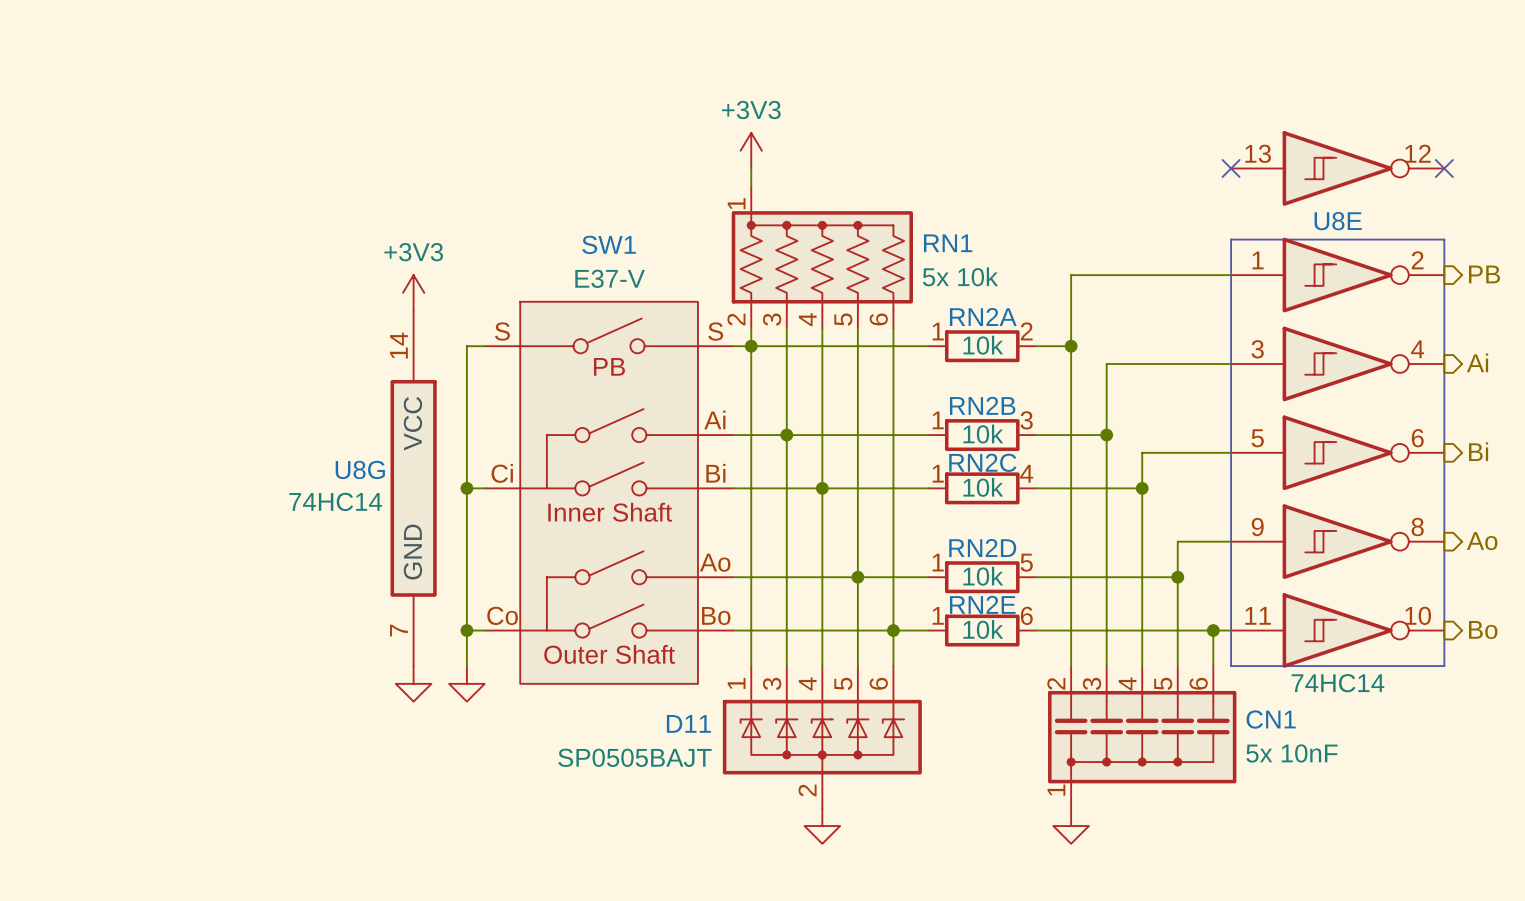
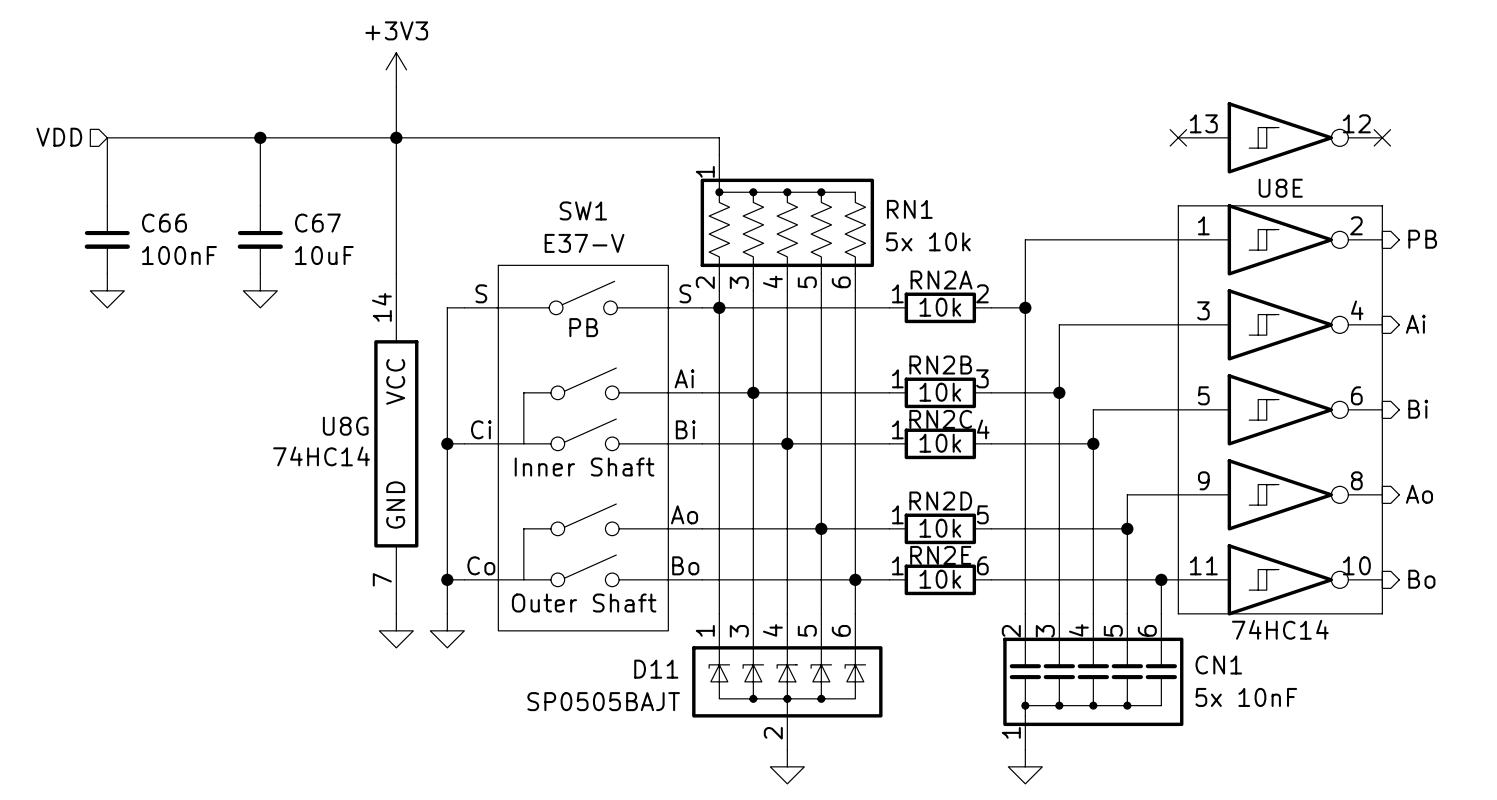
power symbol: none -> +3V3 (396, 69)
wire: none -> (396, 86) (396, 273)
power symbol: +3V3 (751, 150) -> none
hierarchical label: none -> VDD (59, 137)
wire: none -> (260, 137) (260, 205)
junction: none -> (260, 137)
junction: none -> (396, 137)
wire: none -> (719, 137) (107, 137) (107, 205)
C66: none -> 100nF (107, 239)
C67: none -> 10uF (260, 239)
power symbol: +3V3 (413, 292) -> none
power symbol: none -> (107, 290)
power symbol: none -> (260, 290)

